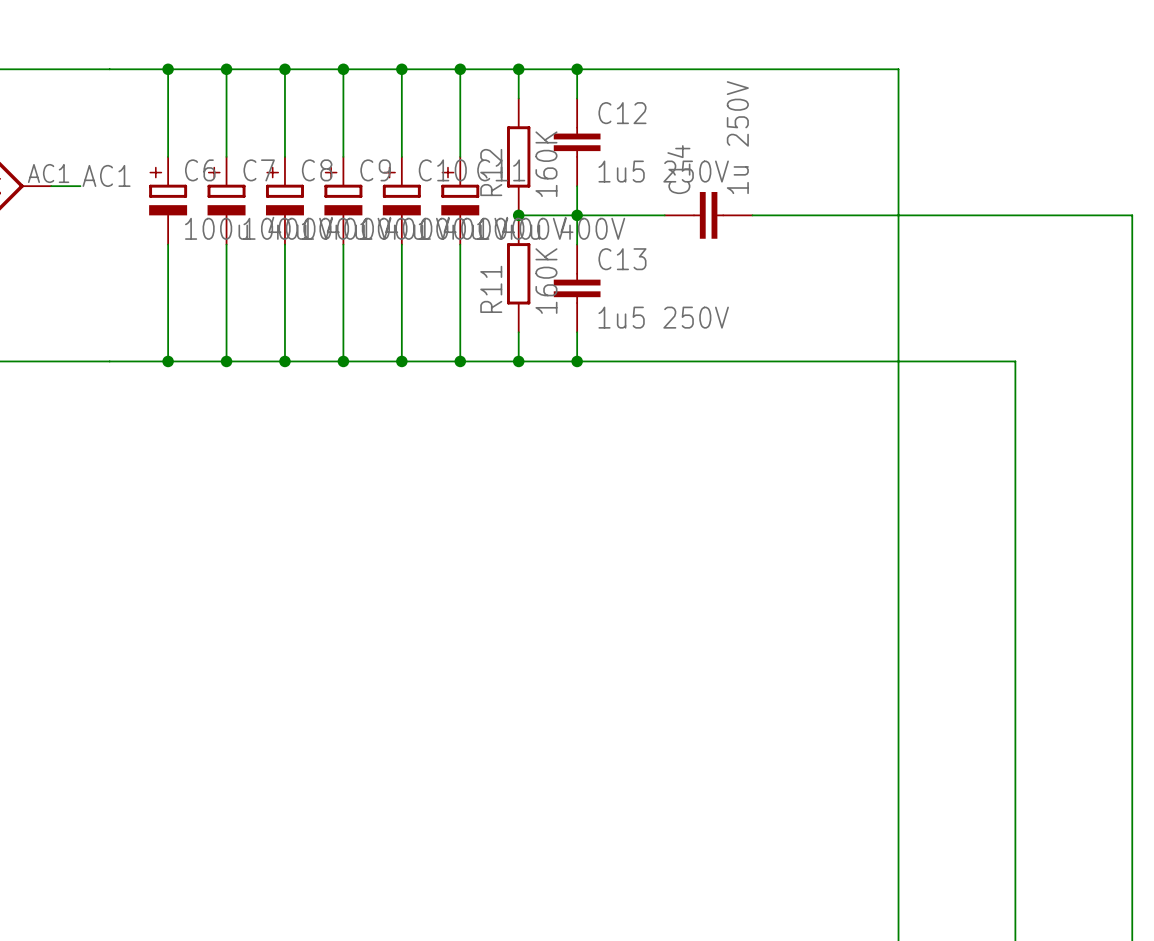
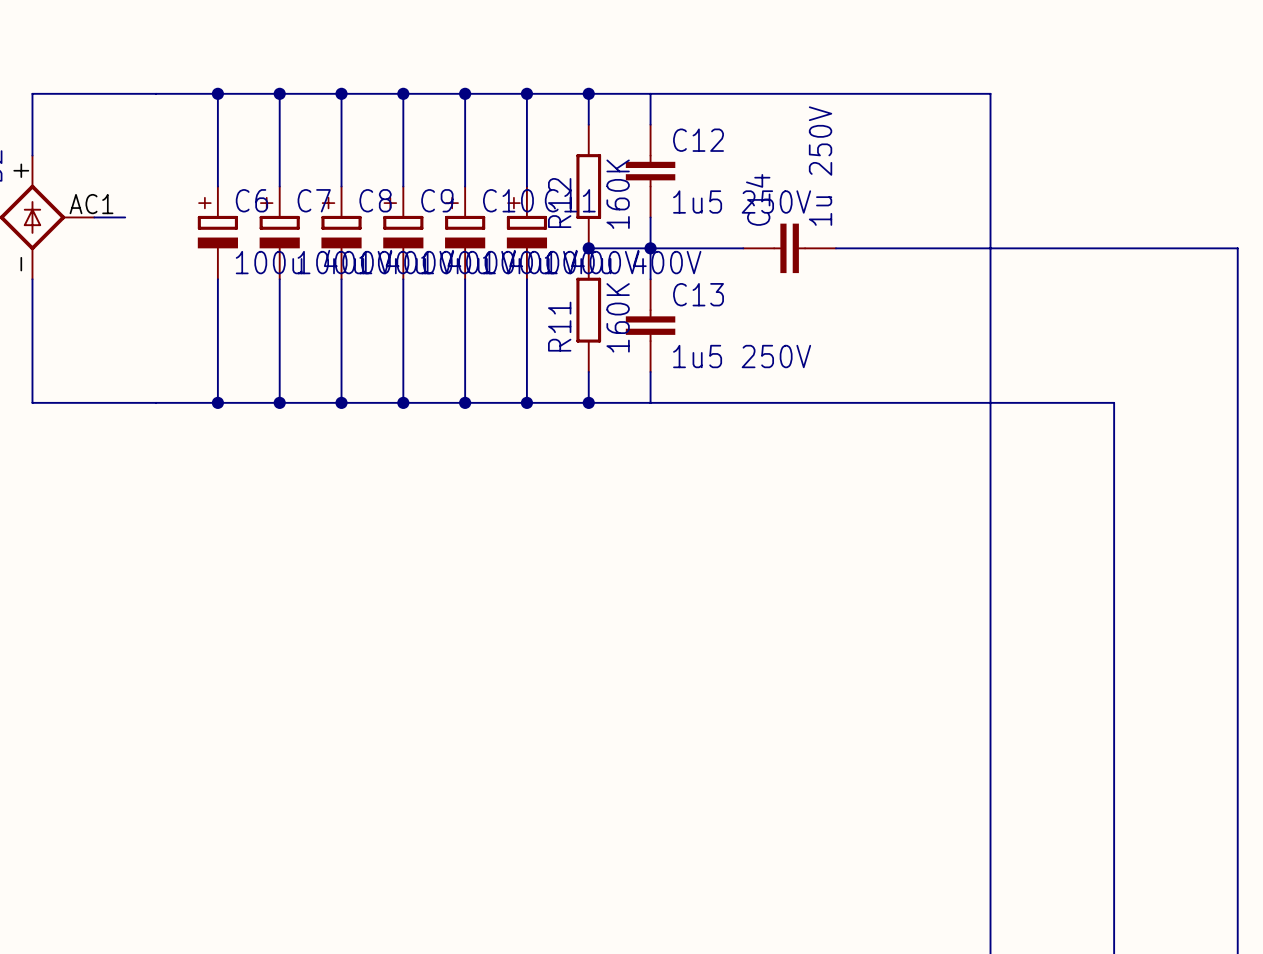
junction: (577, 69) -> none
label: AC1 (106, 175) -> none
junction: (577, 361) -> none

